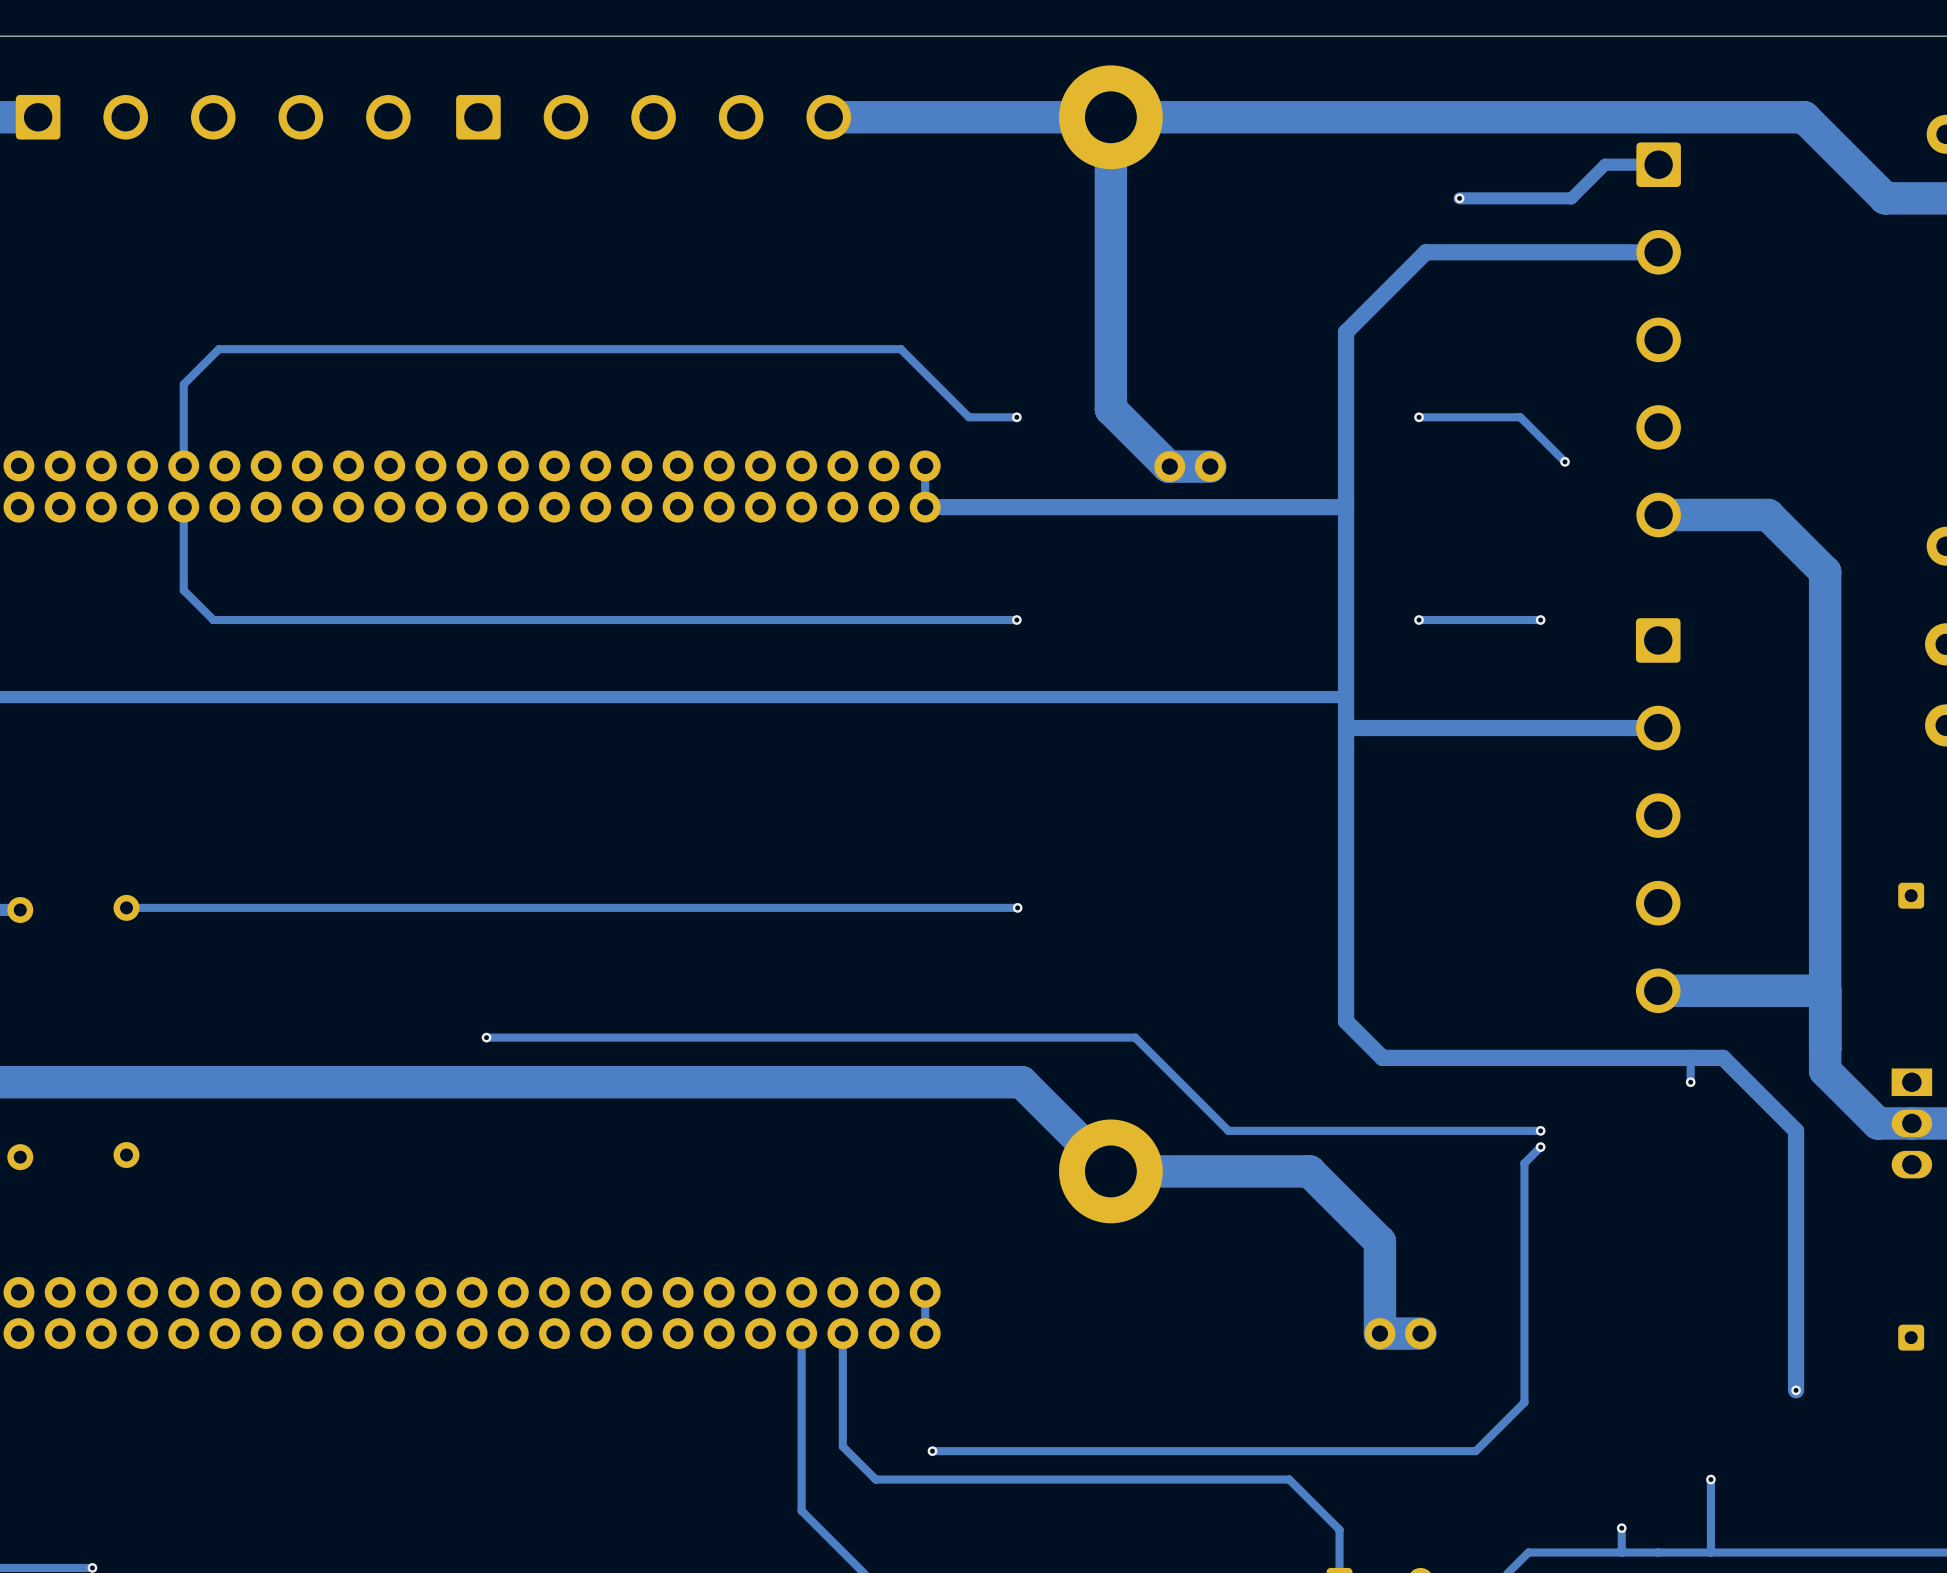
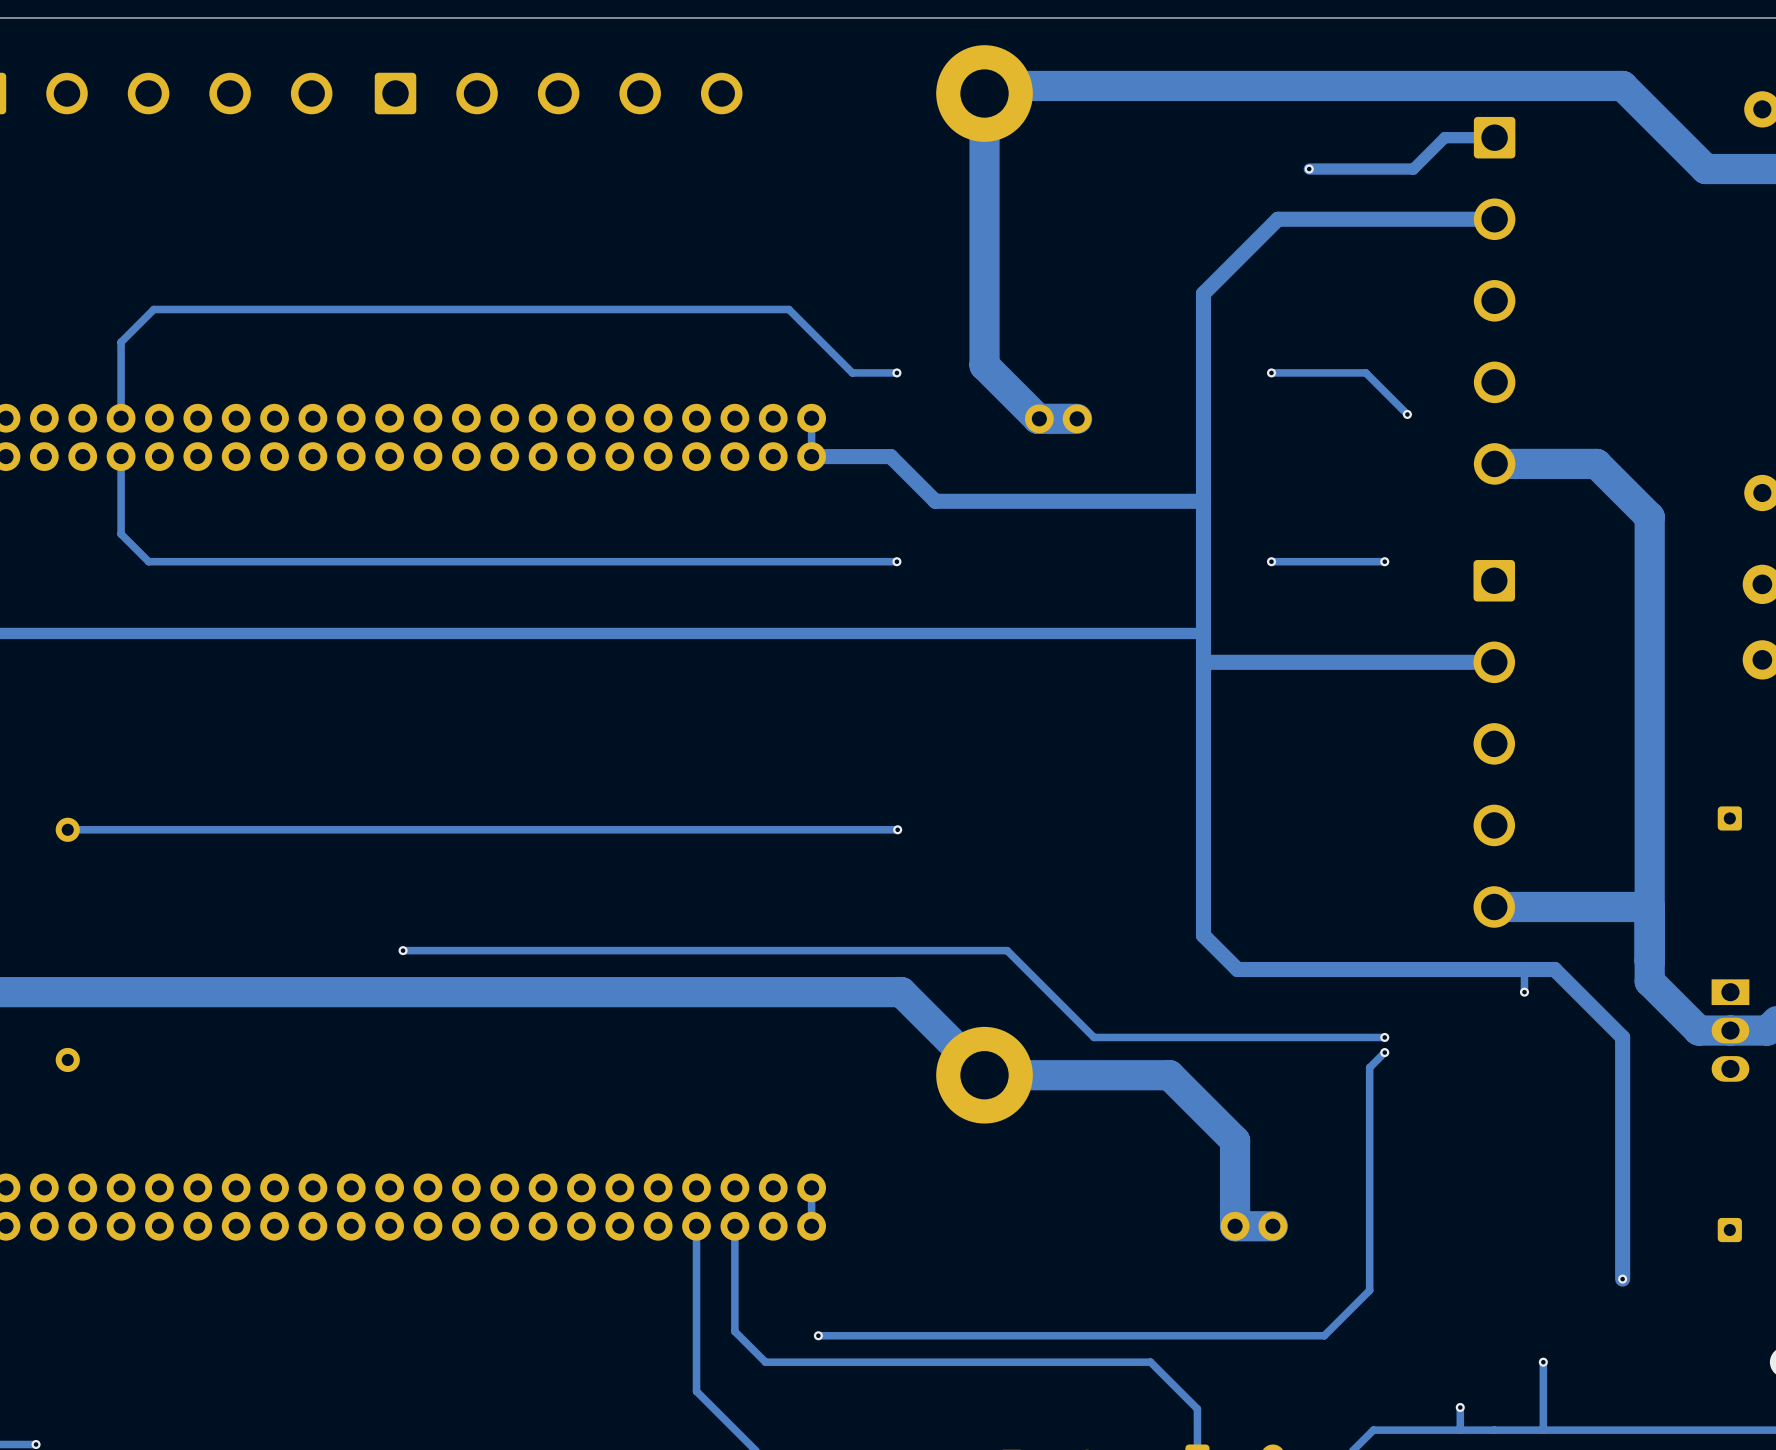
track: (1804, 117) (828, 117) -> (1630, 93) (1622, 85) (992, 85)
track: (1346, 507) (1010, 507) -> (1203, 497) (1199, 501) (935, 501) (890, 456)

